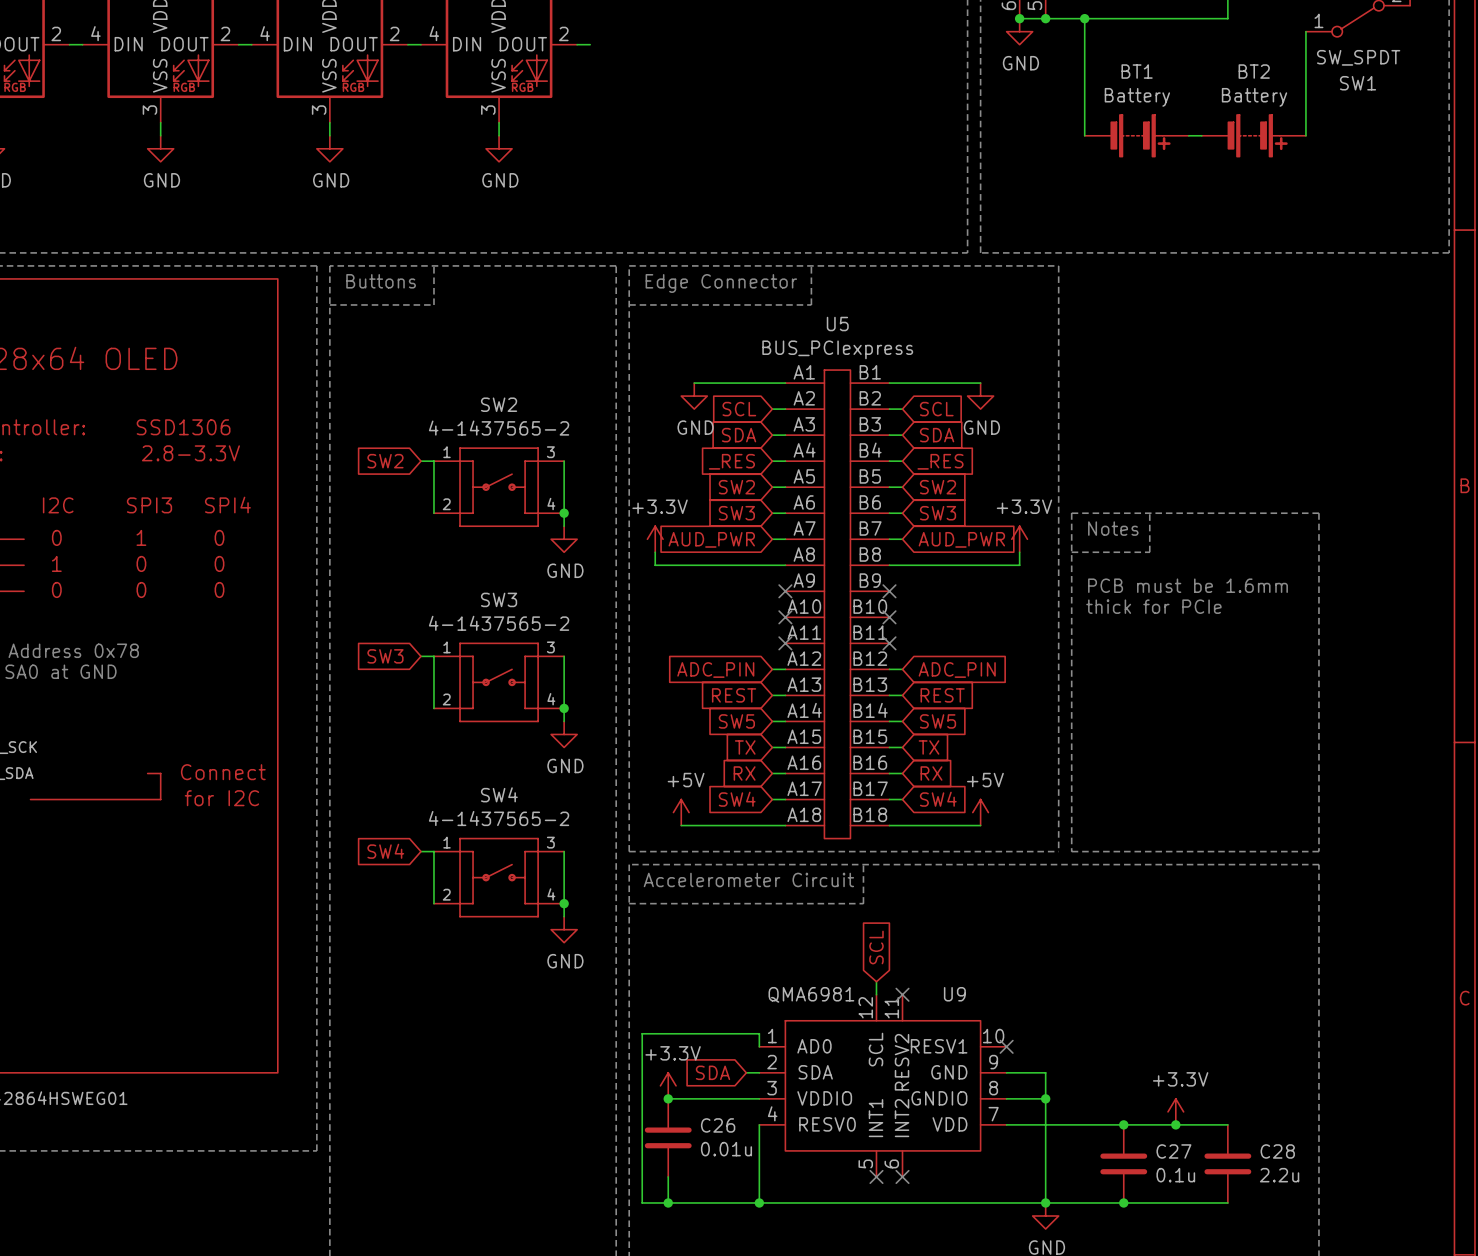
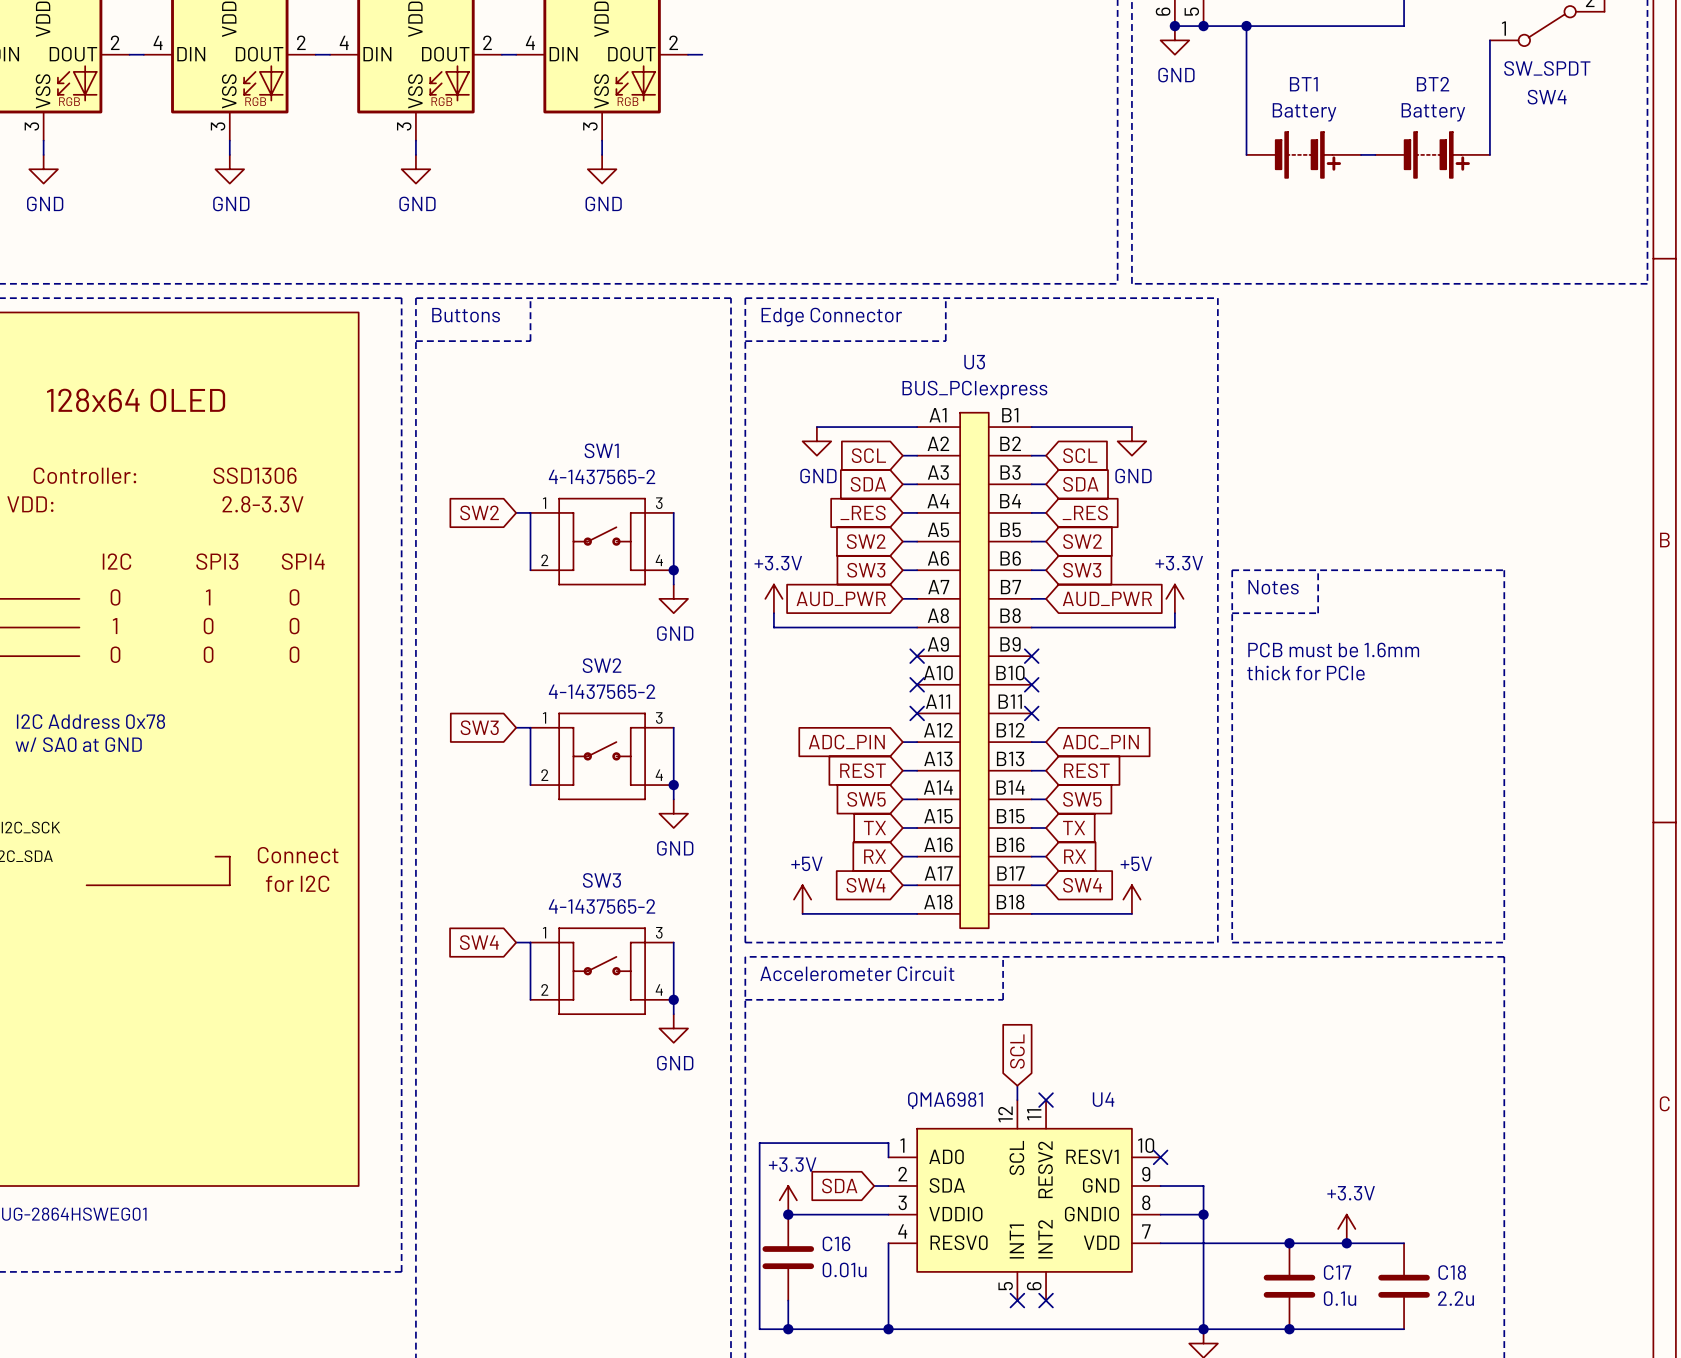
SW1 name: SW1 (1358, 83) -> SW4 (1547, 97)
U5 name: U5 (837, 324) -> U3 (974, 362)
SW2 name: SW2 (499, 404) -> SW1 (601, 450)
SW3 name: SW3 (499, 599) -> SW2 (602, 665)
SW4 name: SW4 (499, 794) -> SW3 (601, 880)
U9 name: U9 (954, 994) -> U4 (1103, 1099)
C26 name: C26 (718, 1125) -> C16 (836, 1243)
C27 name: C27 (1173, 1151) -> C17 (1337, 1272)
C28 name: C28 (1277, 1151) -> C18 (1452, 1272)

